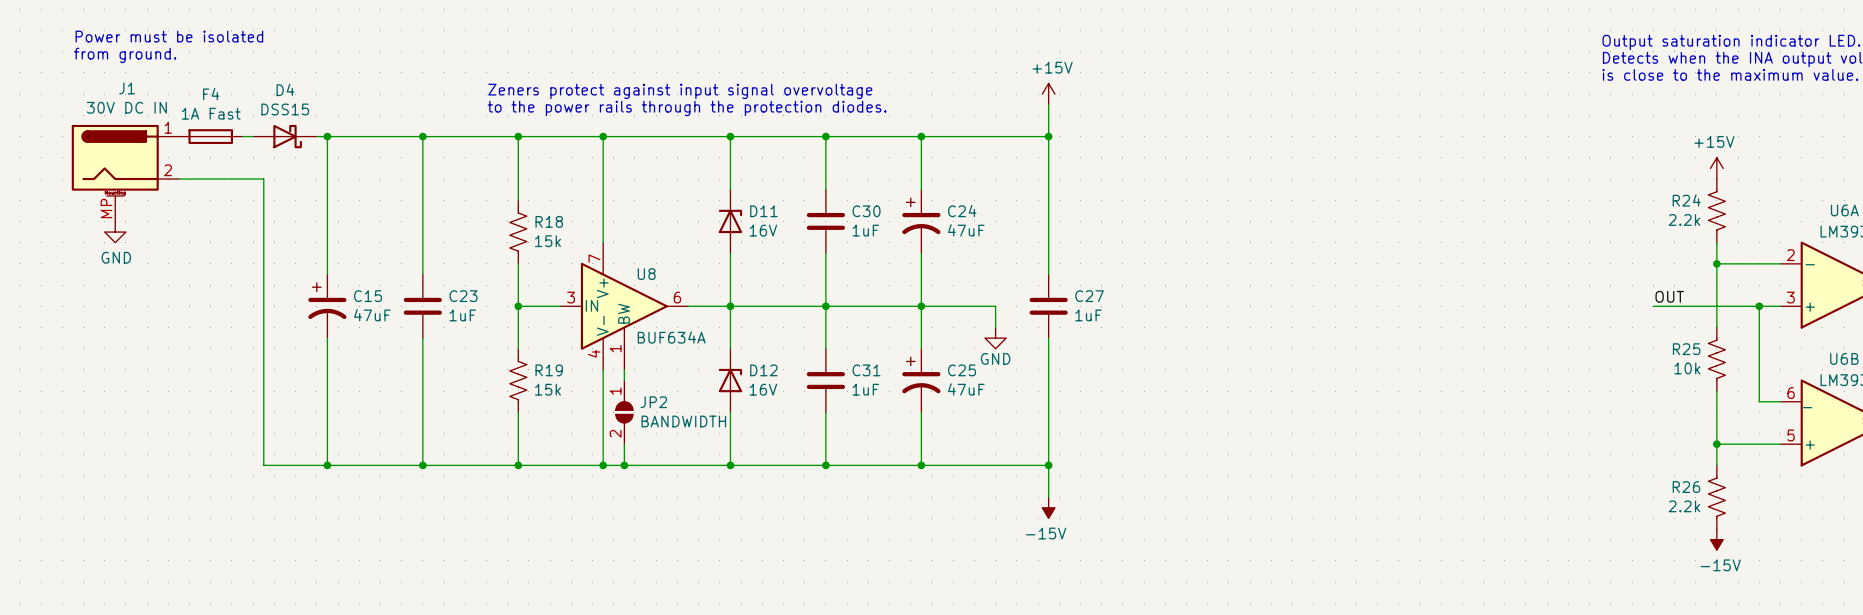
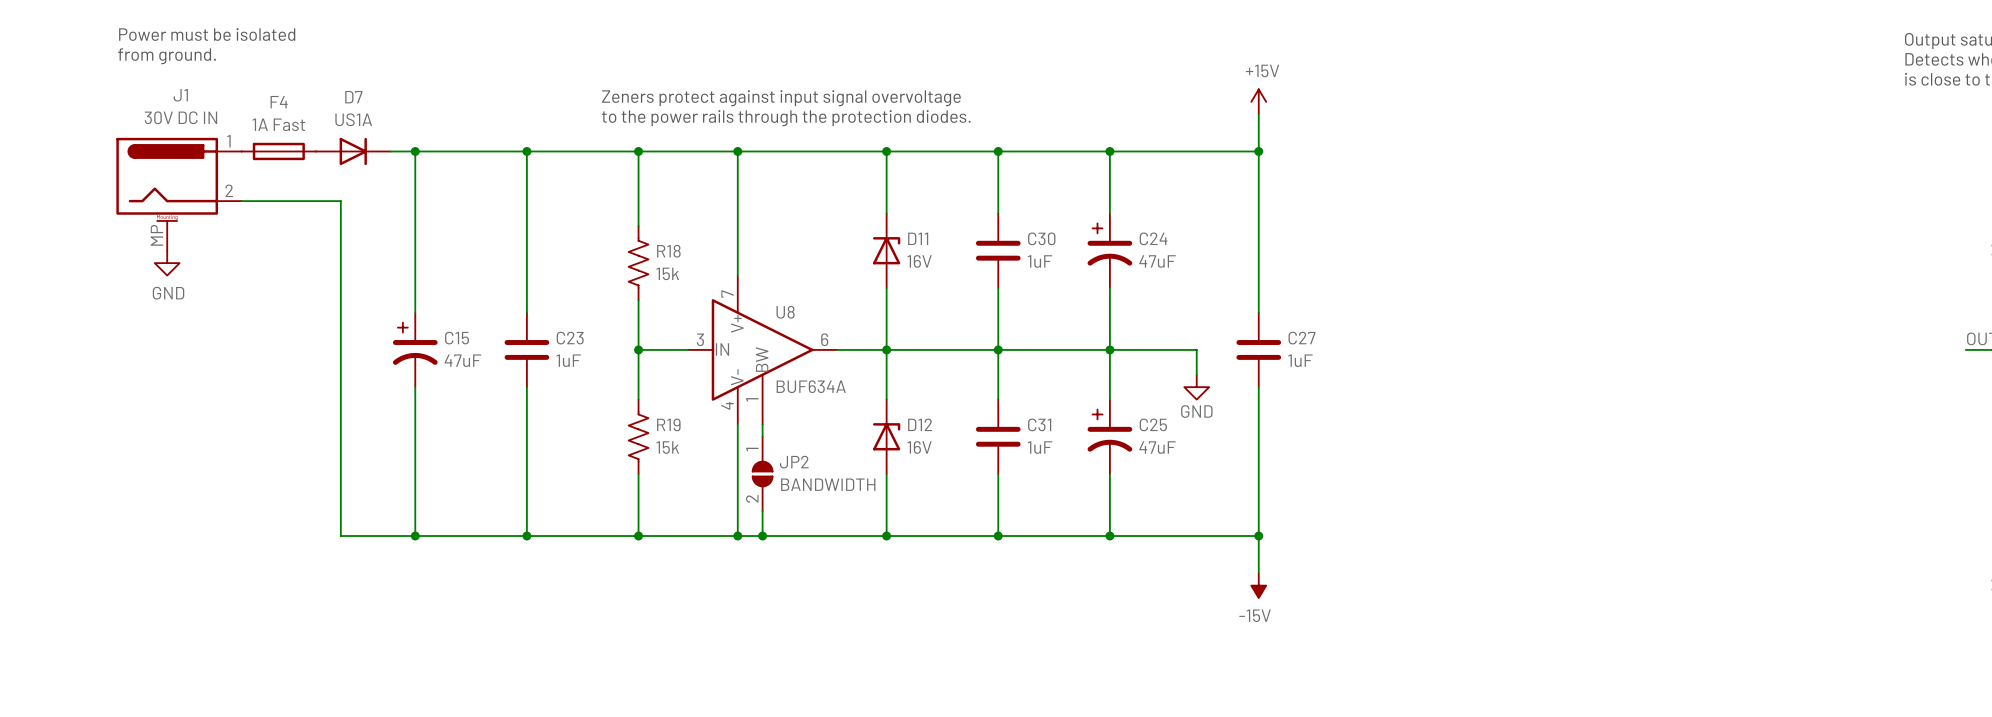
D7: none -> US1A (353, 151)
D4: DSS15 (284, 136) -> none

